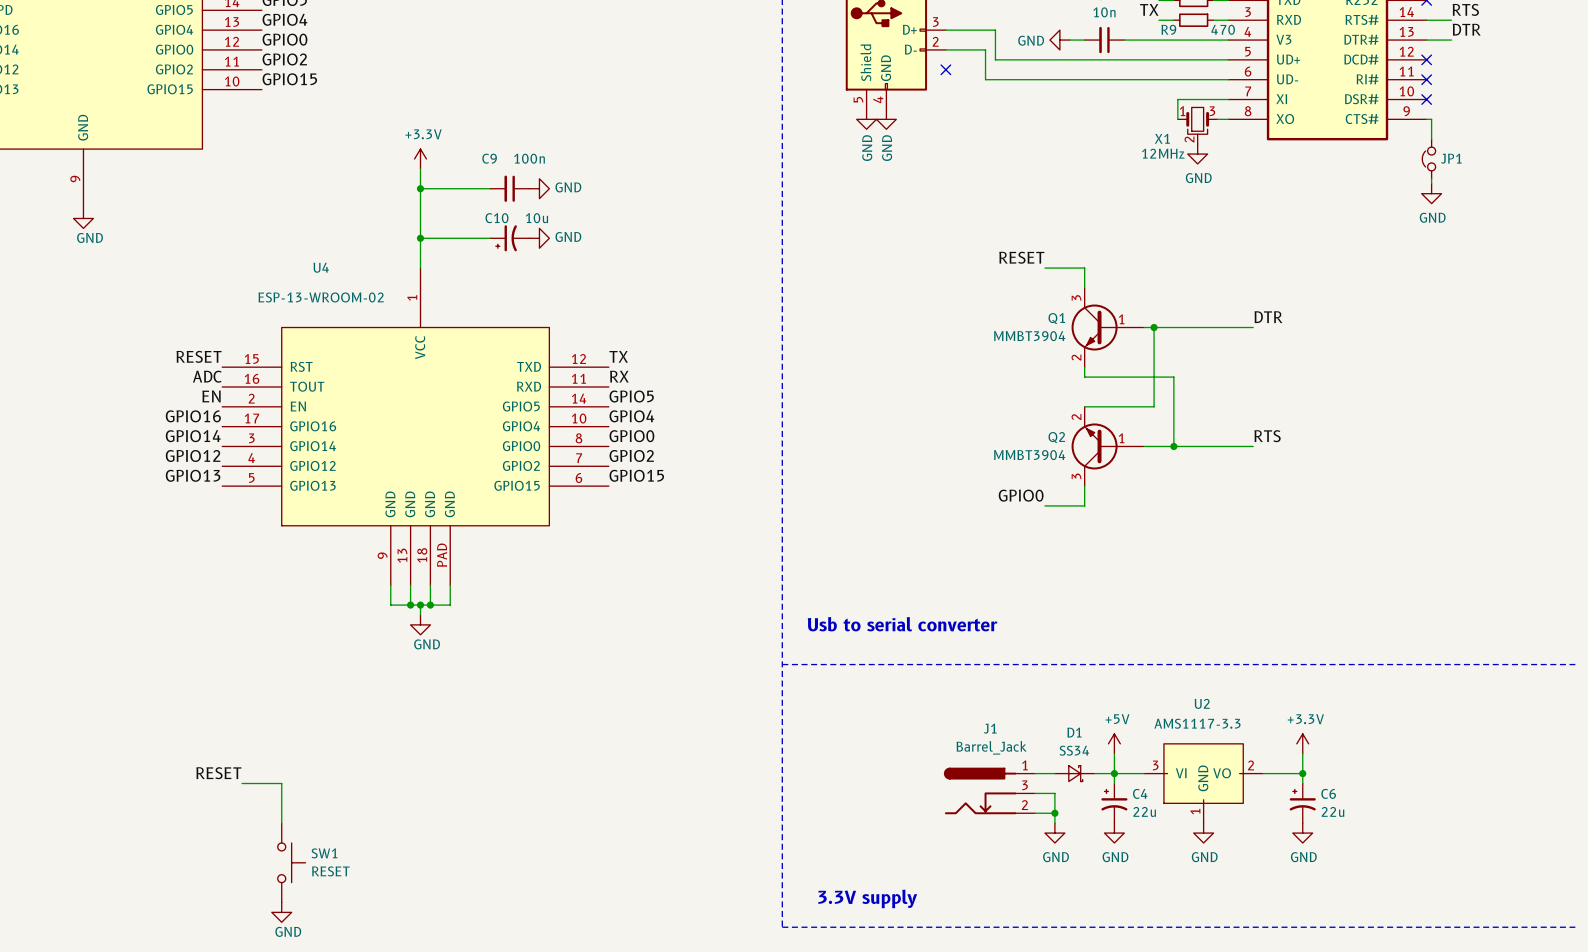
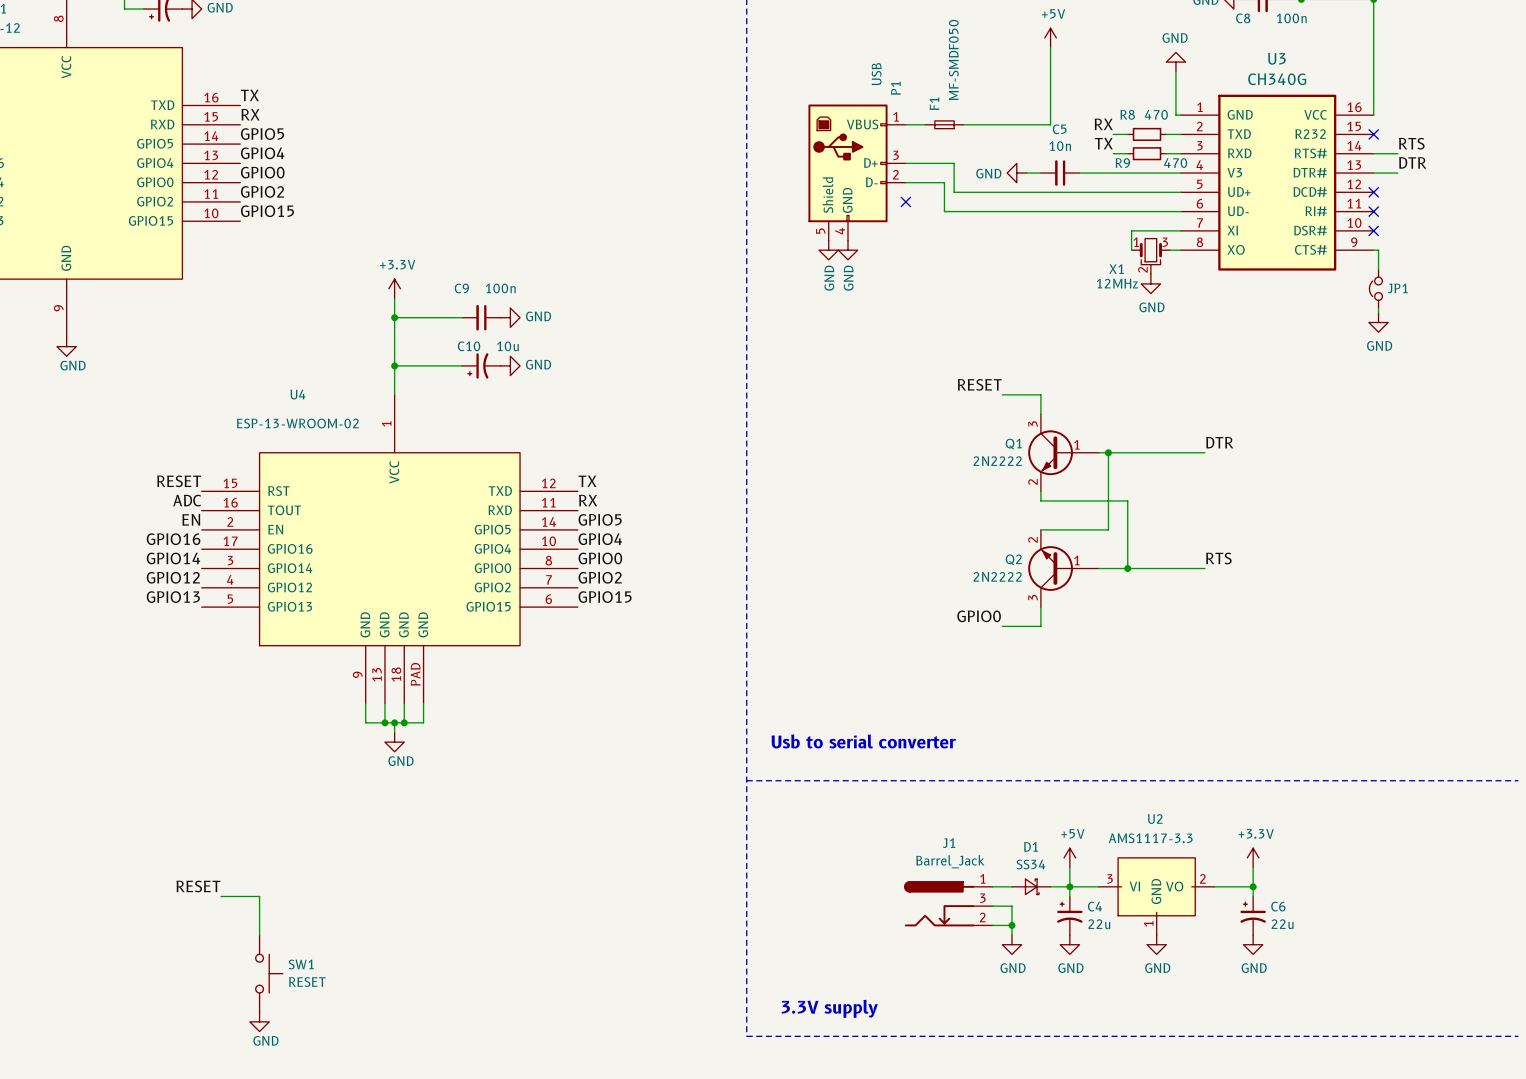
Q1 value: MMBT3904 (1029, 336) -> 2N2222 (997, 461)
Q2 value: MMBT3904 (1029, 455) -> 2N2222 (997, 576)

